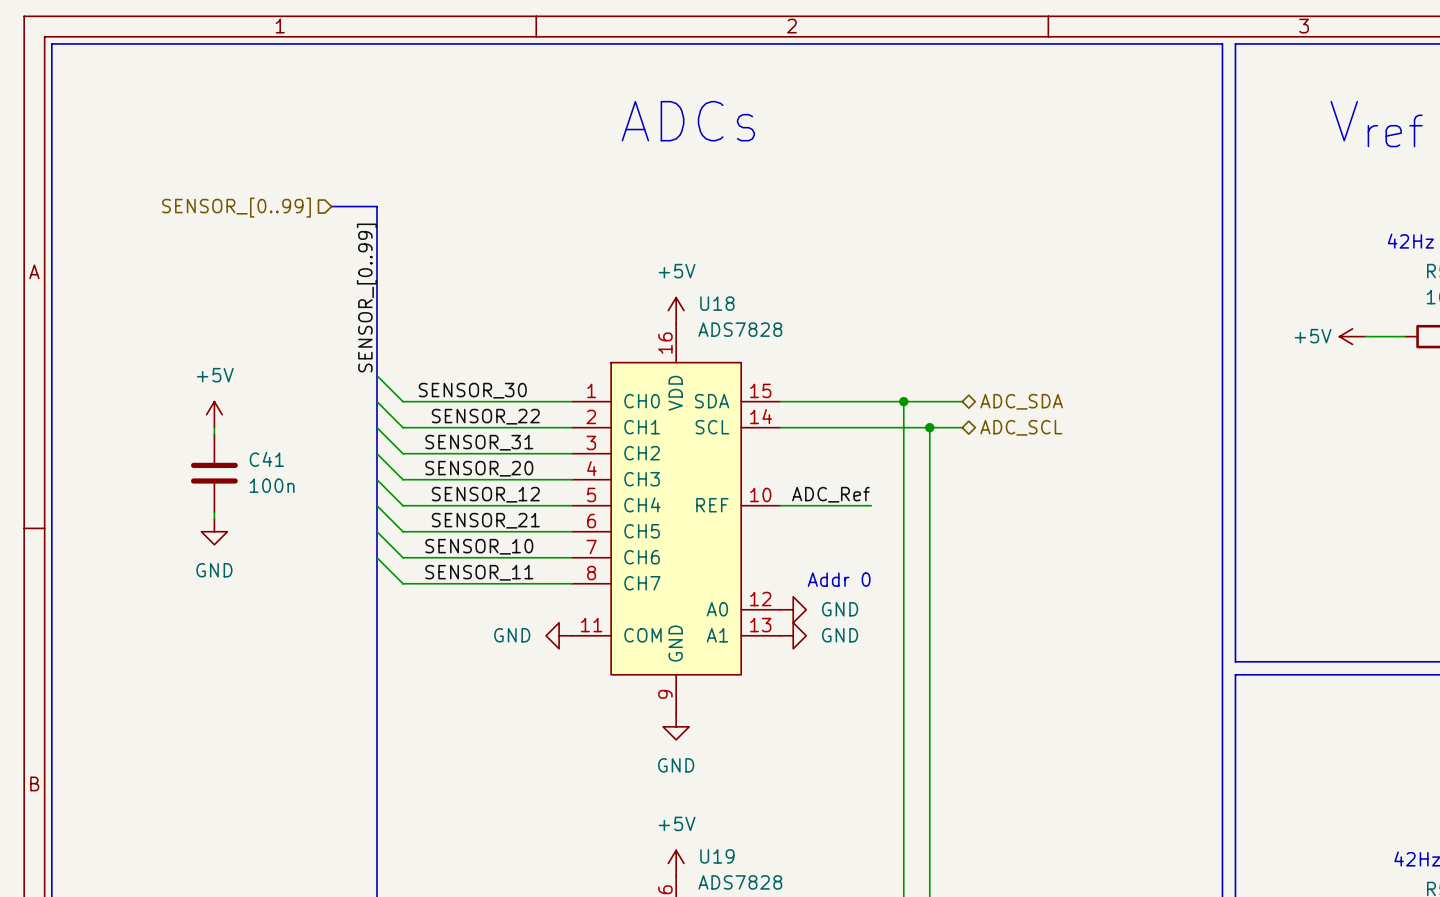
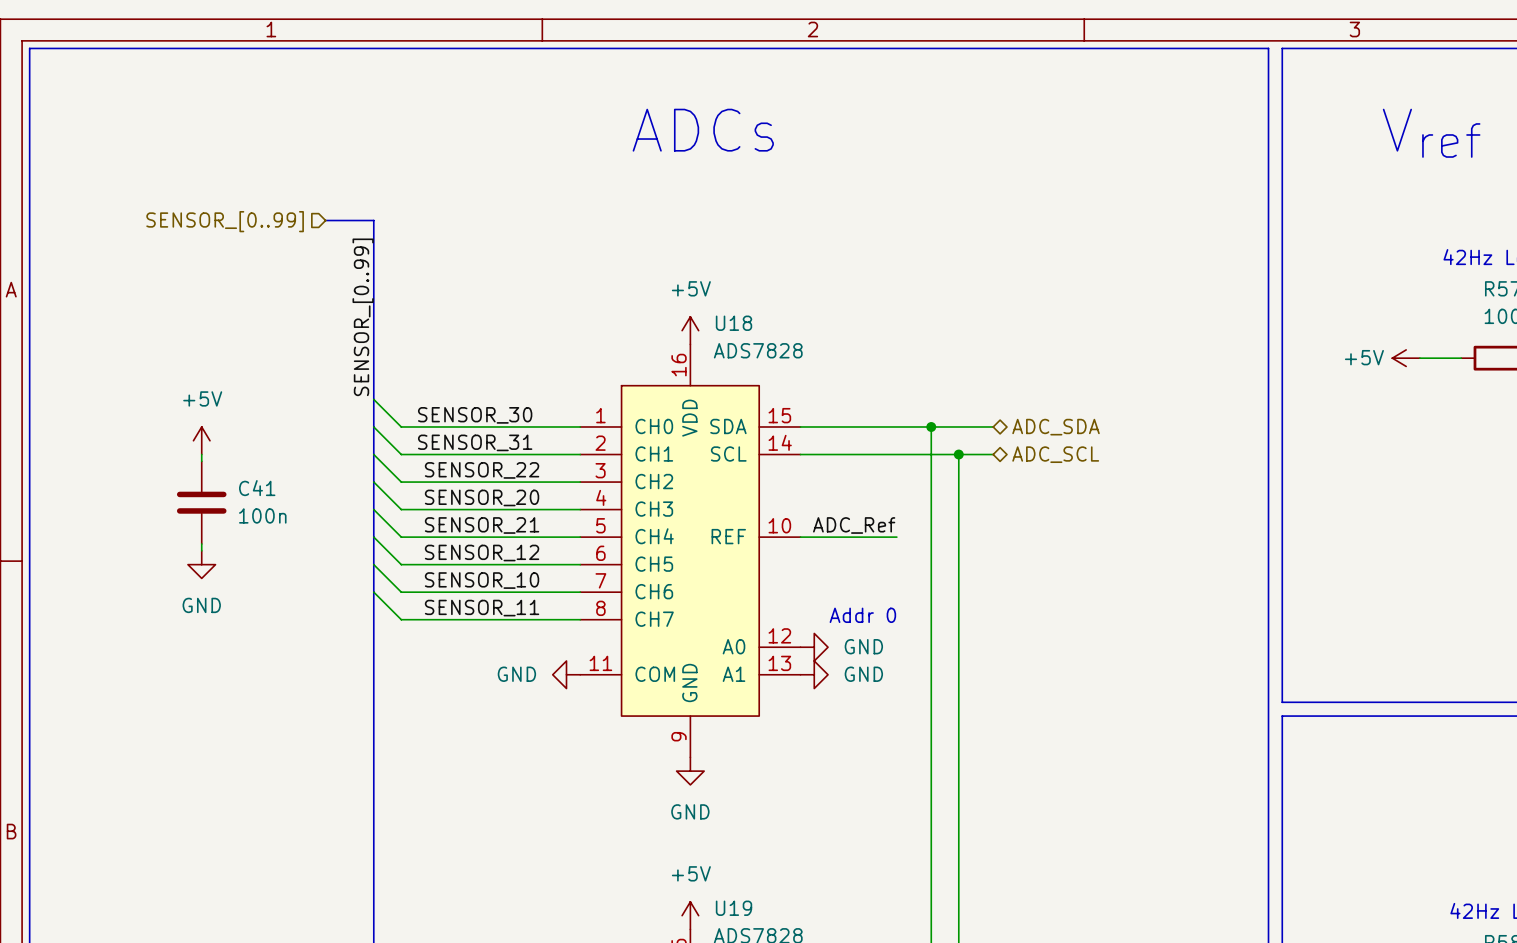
label: SENSOR_22 (485, 416) -> SENSOR_31 (475, 442)
label: SENSOR_31 (479, 442) -> SENSOR_22 (482, 470)
label: SENSOR_12 (485, 494) -> SENSOR_21 (482, 525)
label: SENSOR_21 (485, 520) -> SENSOR_12 (482, 553)

